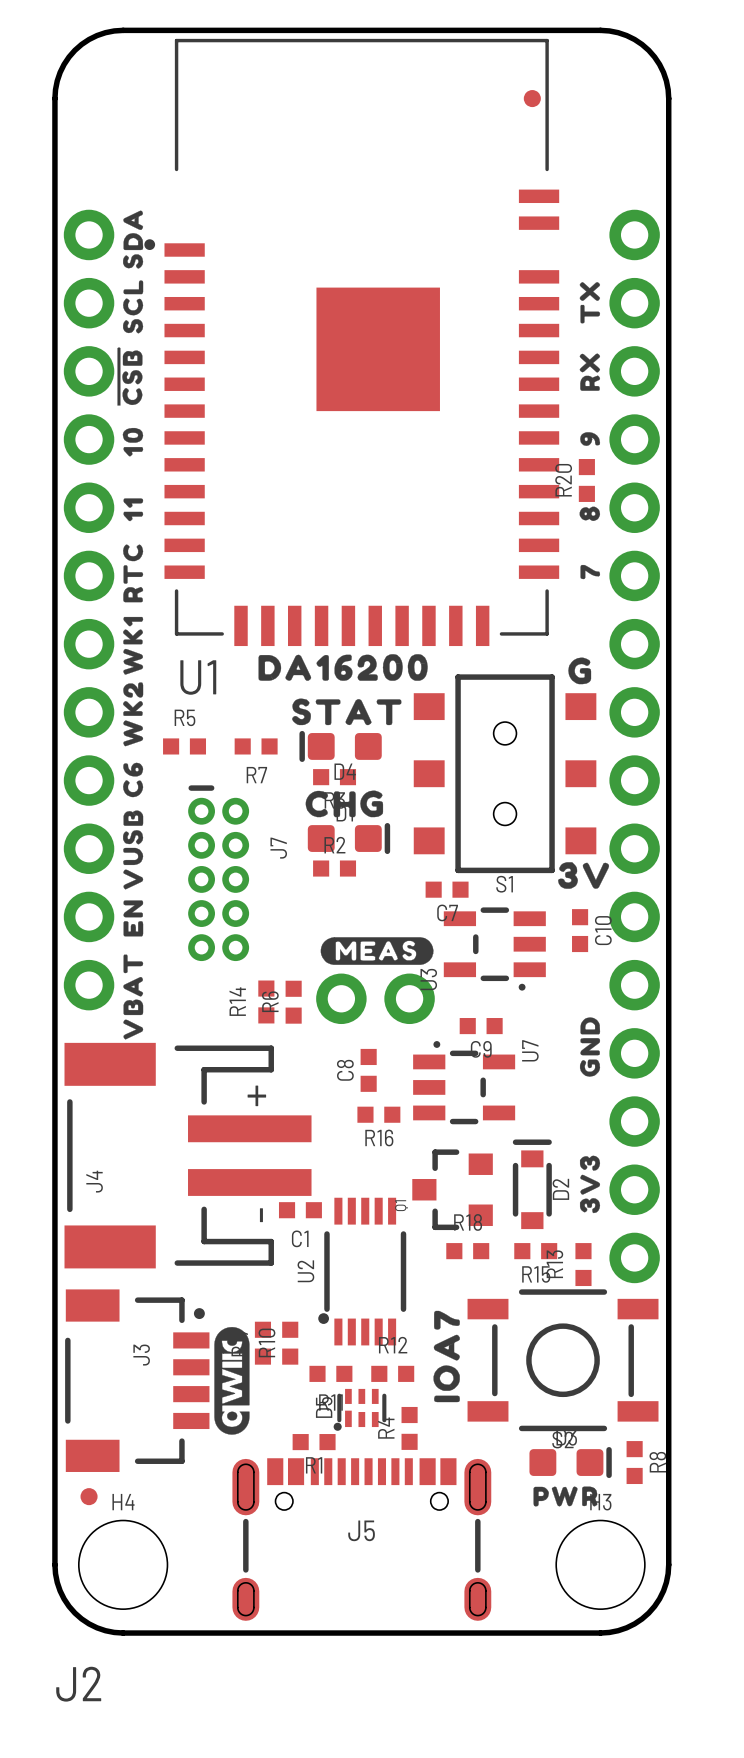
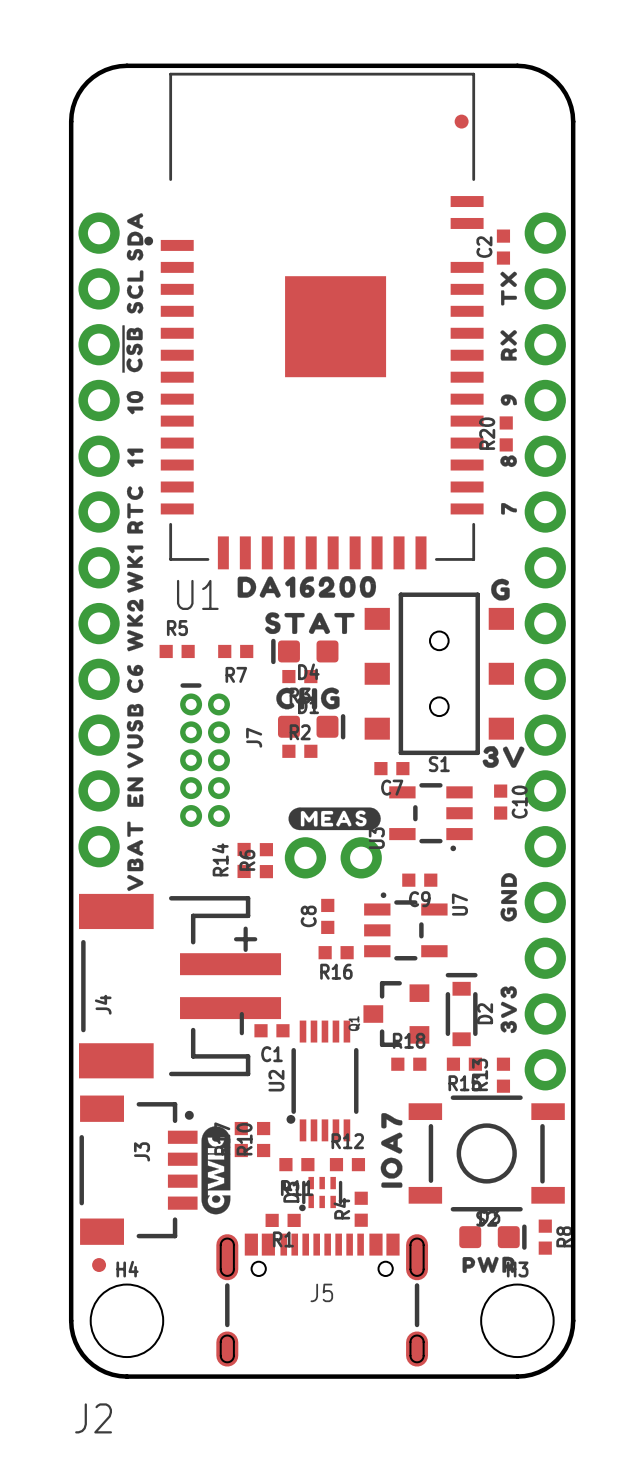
C2: none -> (503, 247)

